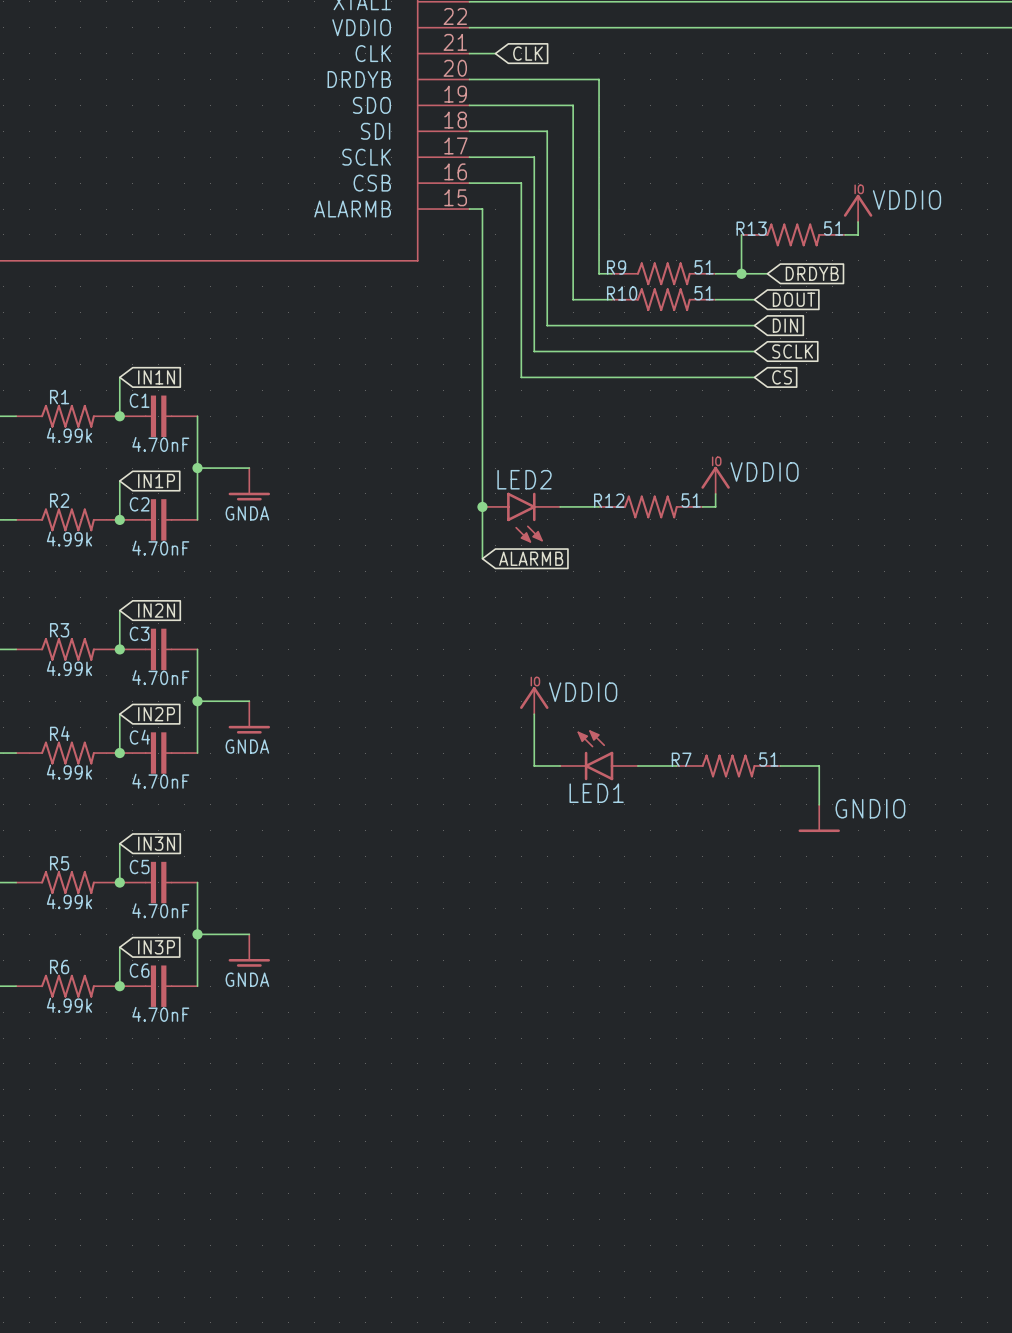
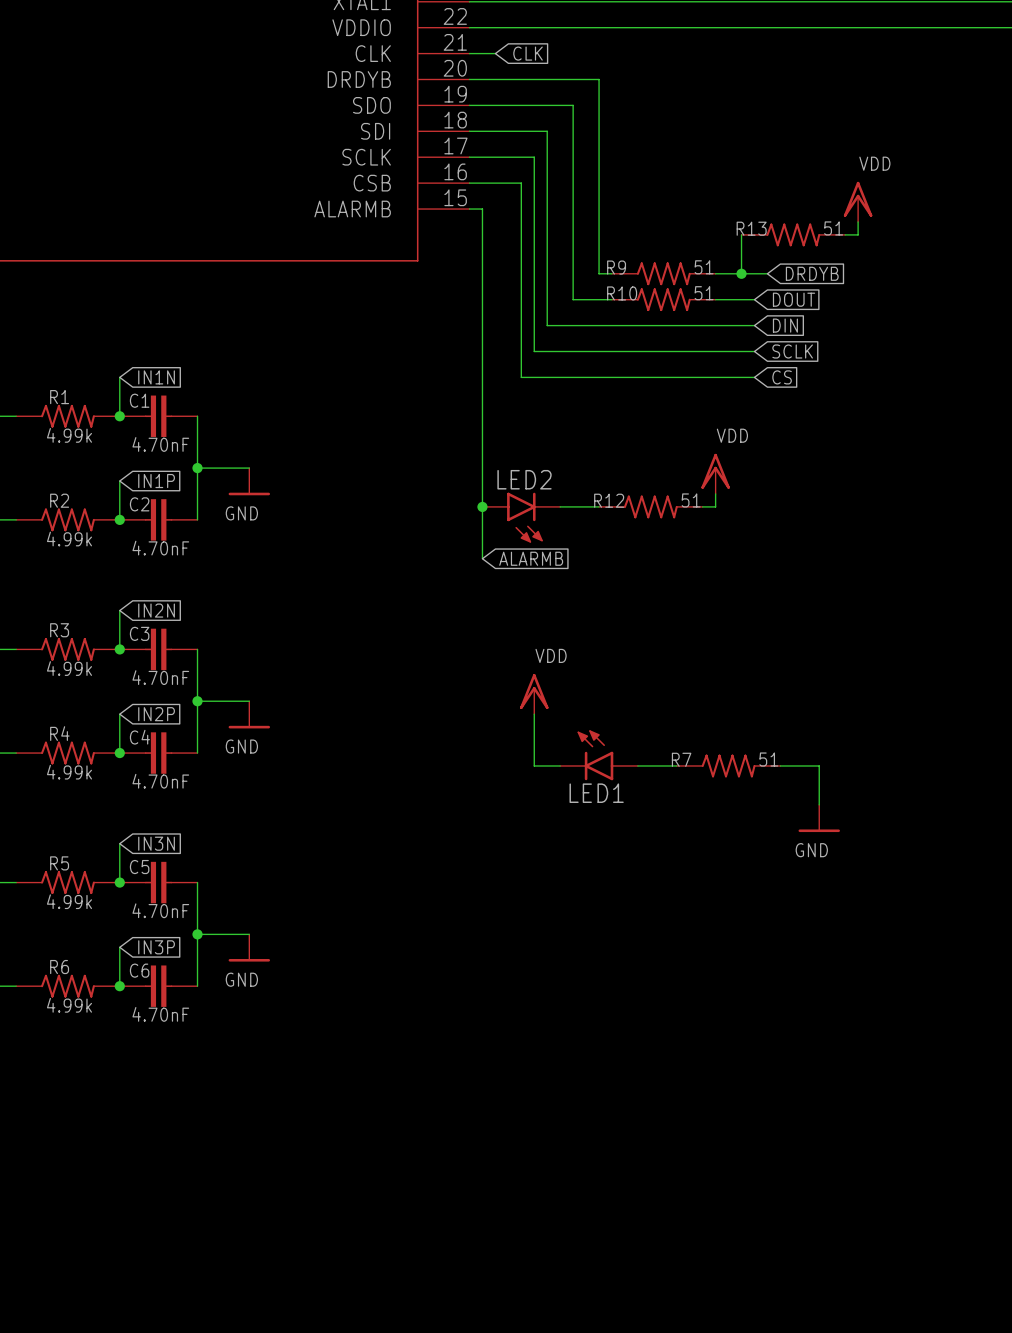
power symbol: VDDIO (858, 208) -> VDD (858, 201)
power symbol: VDDIO (715, 480) -> VDD (715, 473)
power symbol: GNDA (249, 484) -> GND (249, 481)
power symbol: VDDIO (534, 700) -> VDD (534, 694)
power symbol: GNDA (249, 717) -> GND (249, 714)
power symbol: GNDIO (819, 818) -> GND (819, 818)
power symbol: GNDA (249, 950) -> GND (249, 947)

